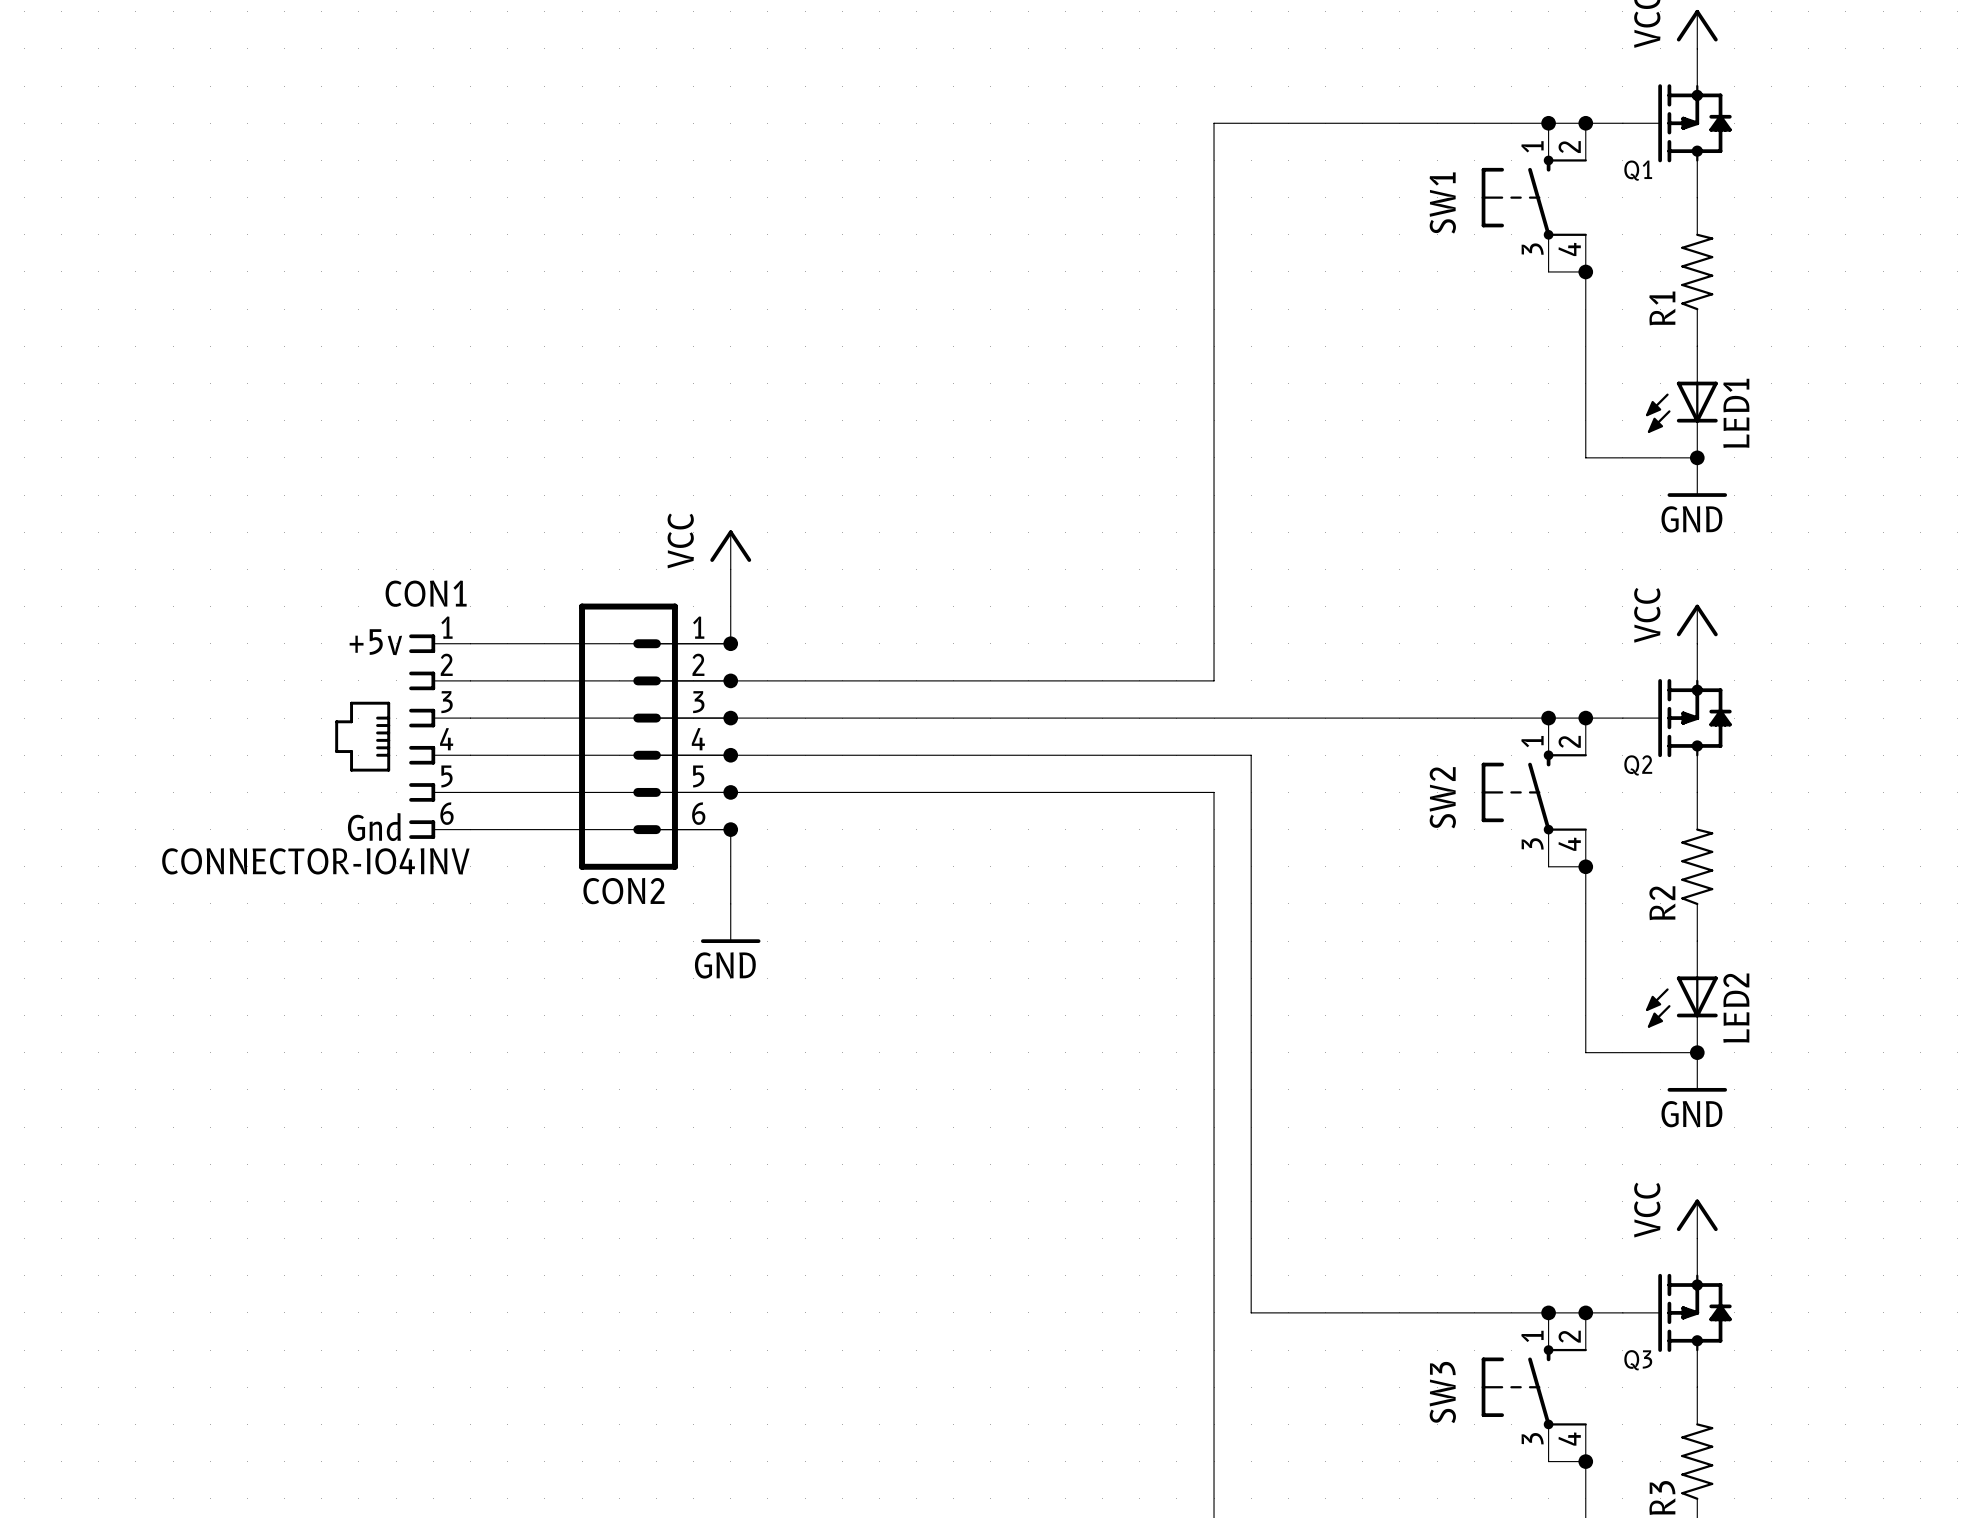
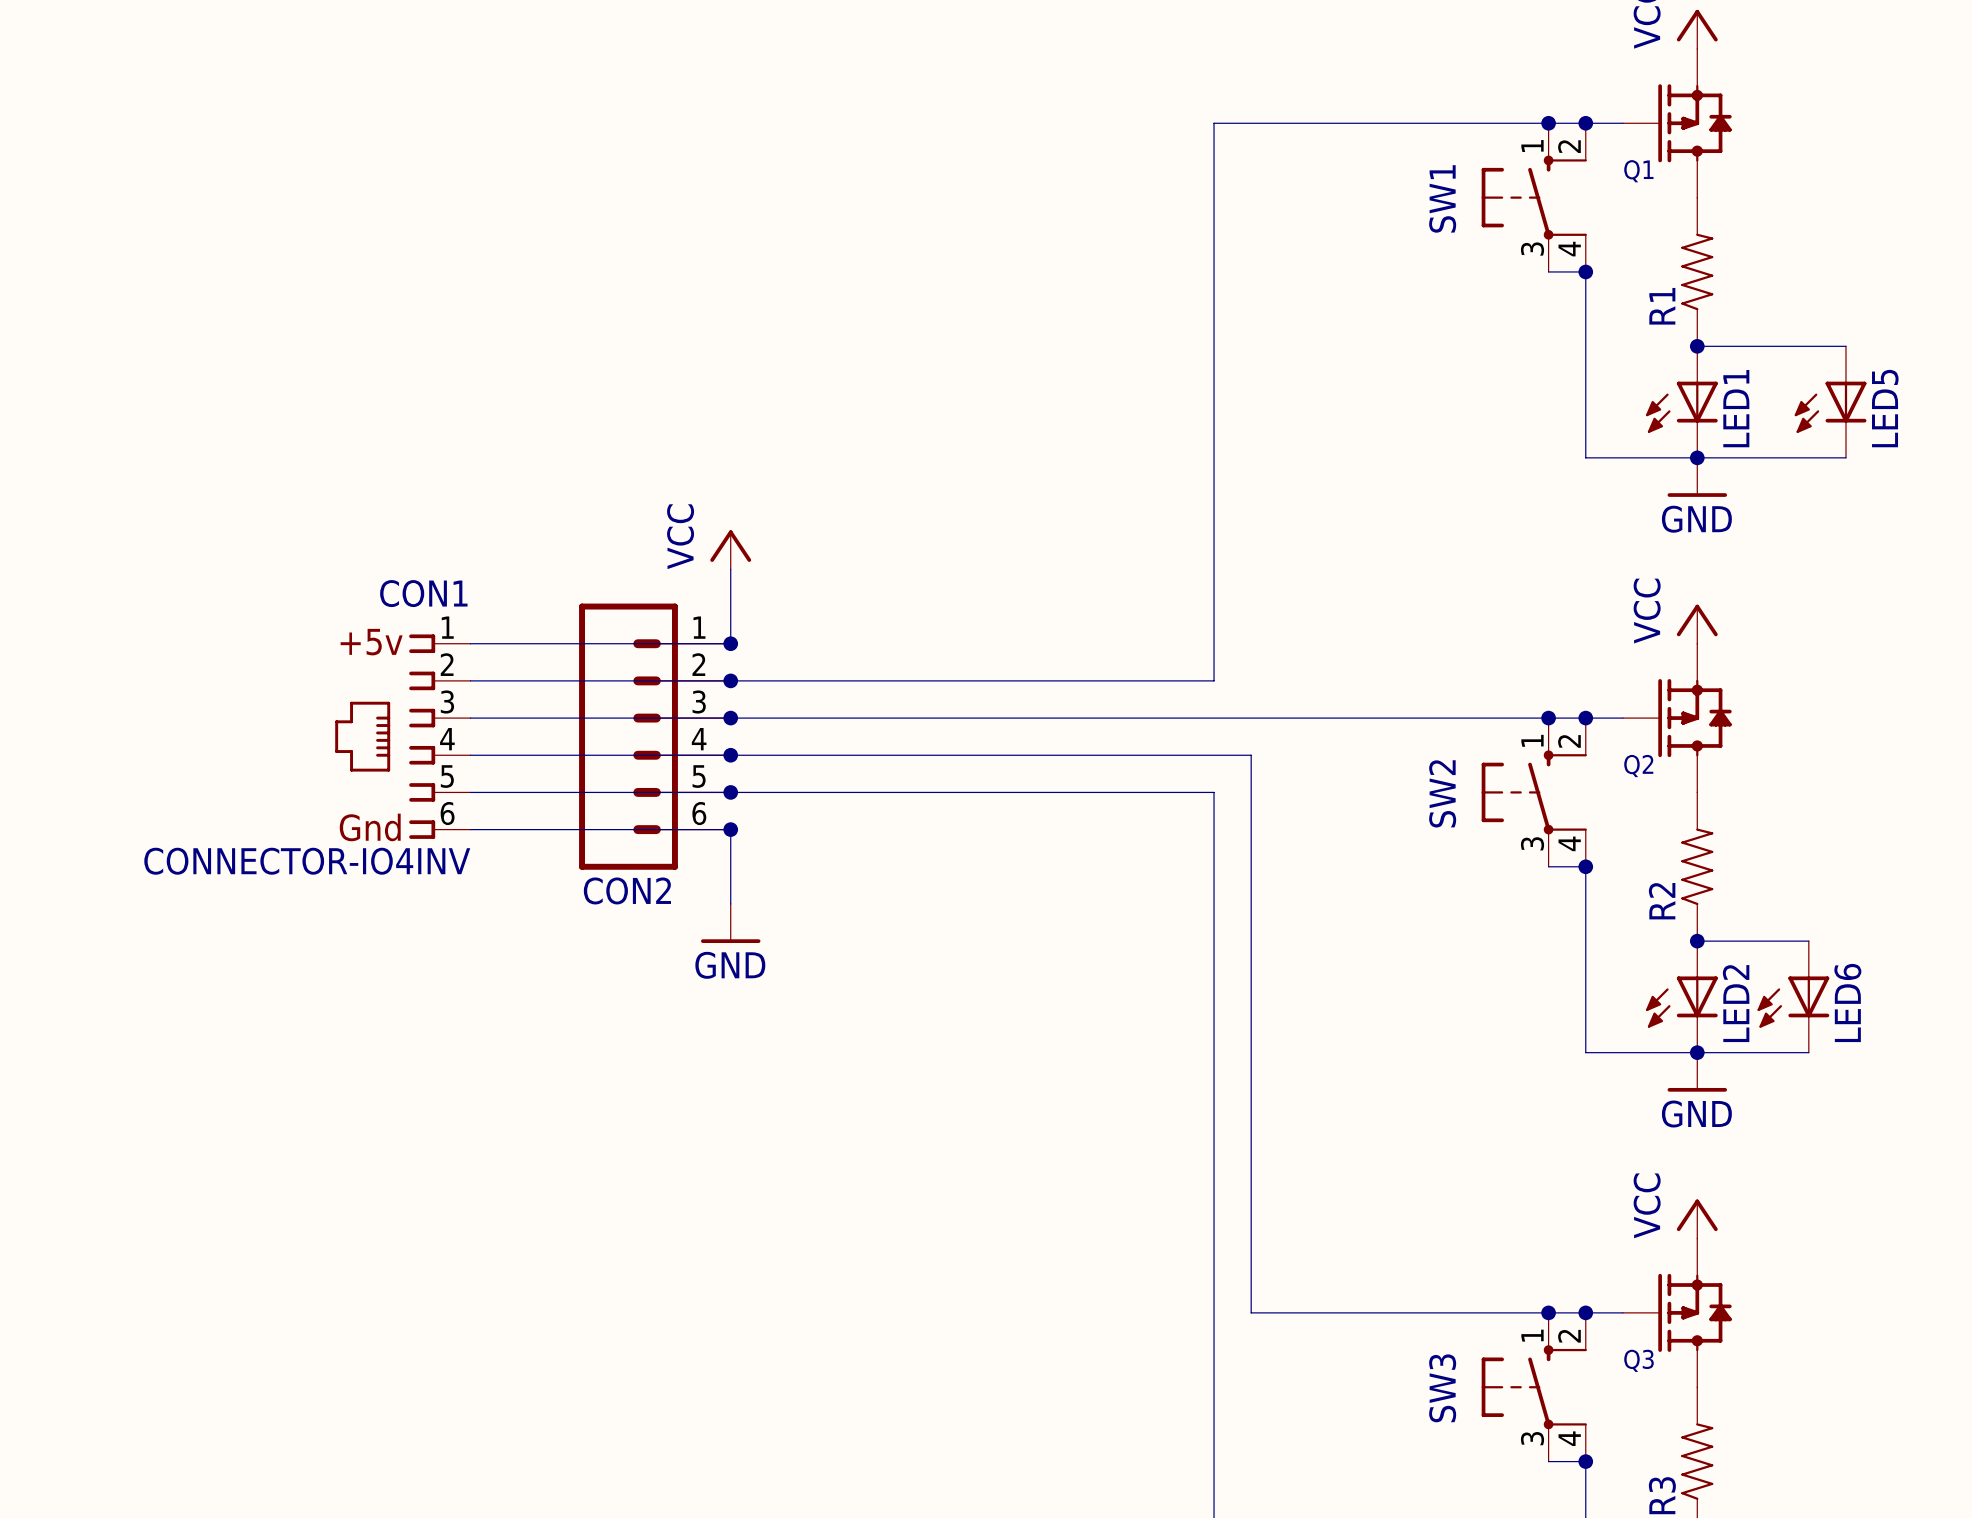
wire: none -> (1697, 346) (1845, 346)
junction: none -> (1697, 346)
LED5: none -> (1830, 402)
wire: none -> (1697, 457) (1845, 457)
wire: none -> (1697, 941) (1808, 941)
junction: none -> (1697, 941)
LED6: none -> (1793, 996)
wire: none -> (1697, 1052) (1808, 1052)

